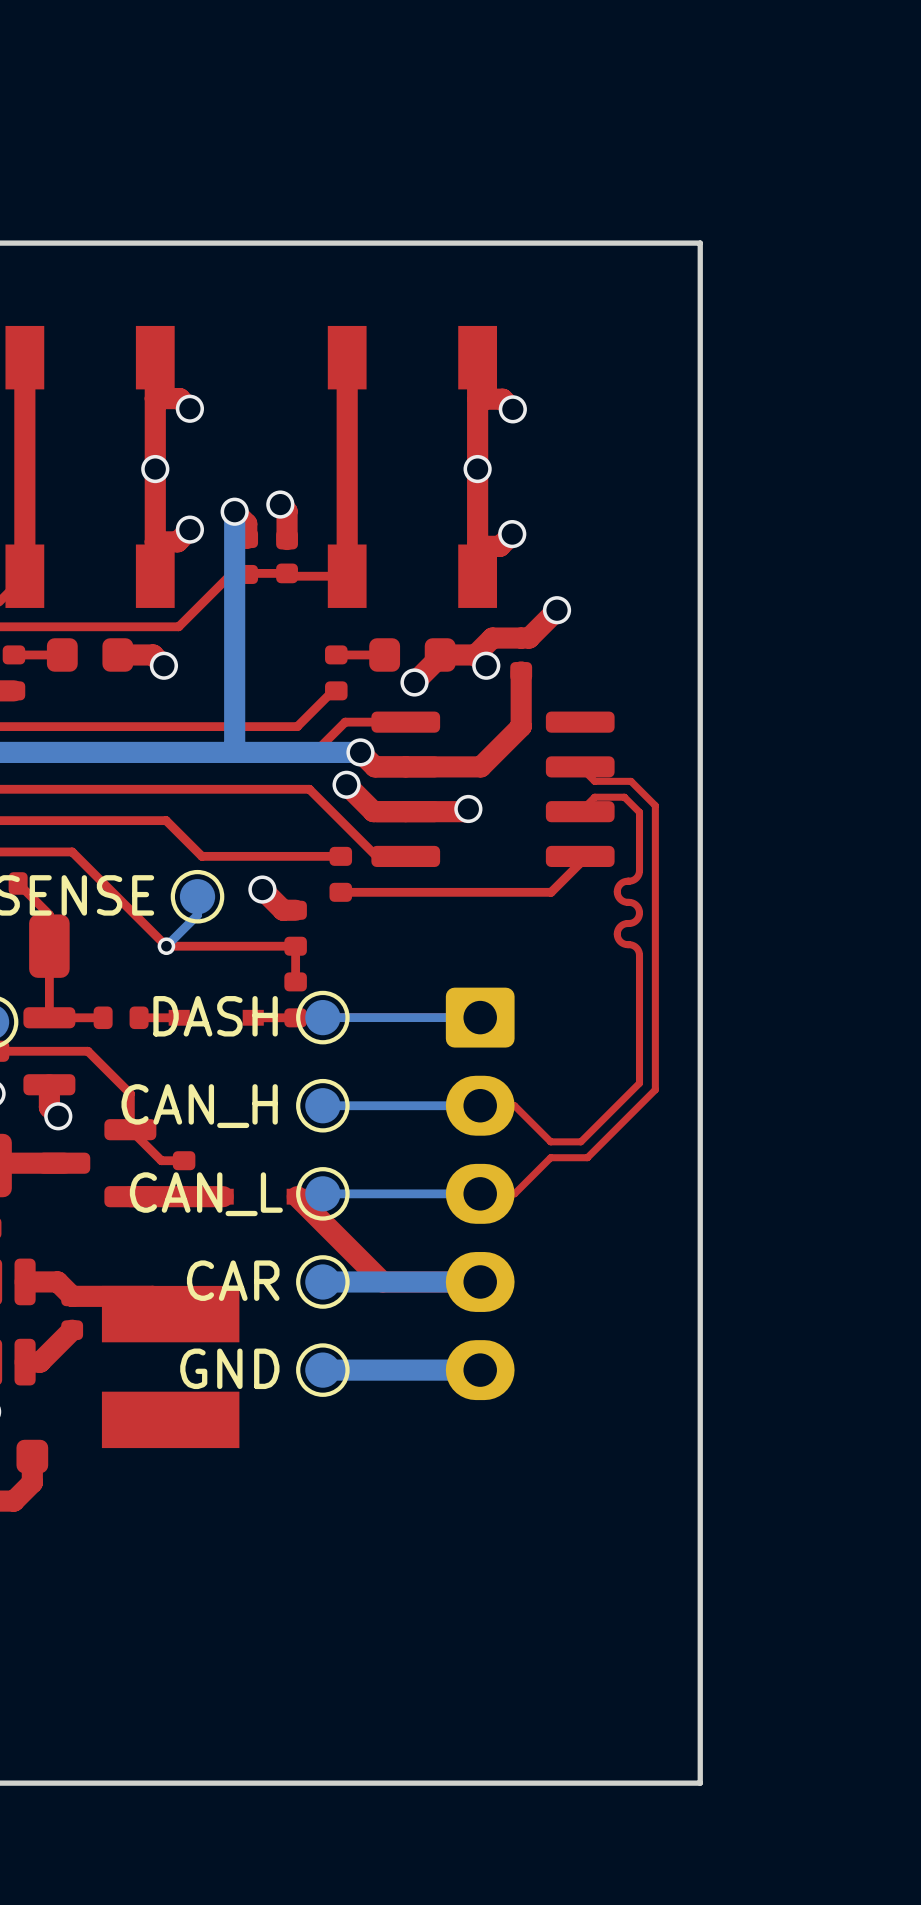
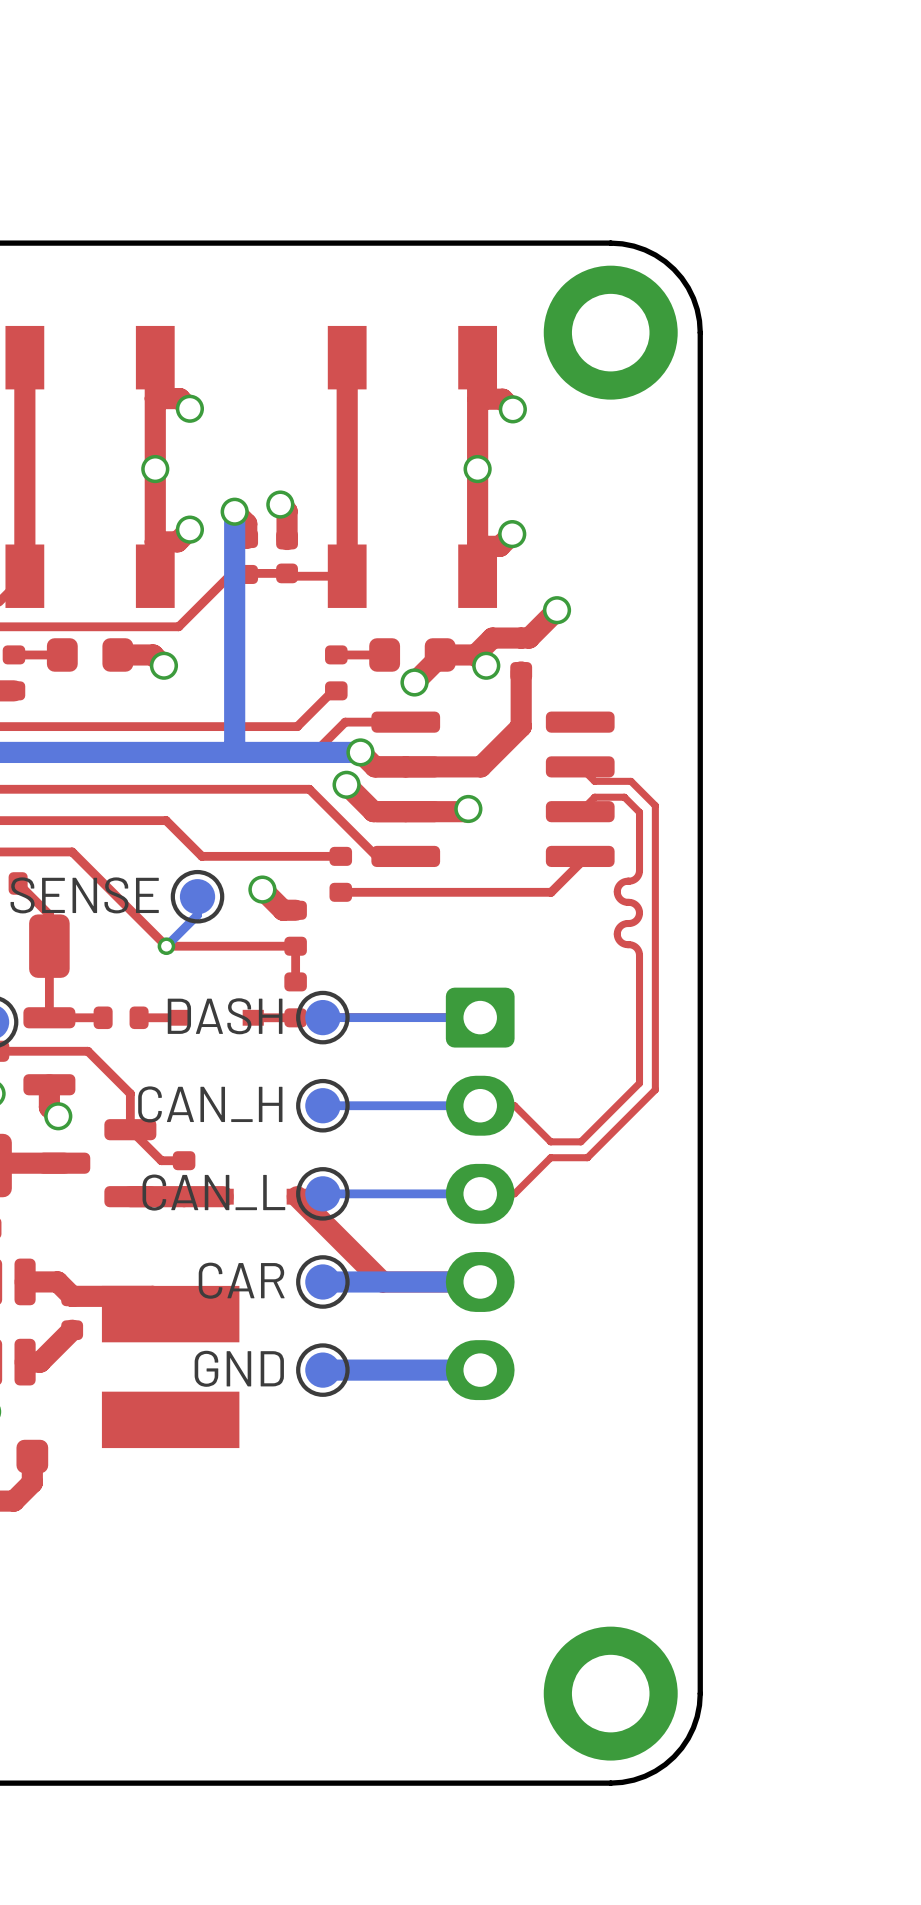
board edge: (610, 243) (700, 243) (700, 332) -> (610, 243) (622, 243) (644, 249) (655, 255) (674, 269) (681, 278) (693, 298) (699, 320) (700, 332)
part: none -> (610, 332)
part: none -> (610, 1693)
board edge: (700, 1693) (700, 1783) (610, 1783) -> (700, 1693) (699, 1705) (693, 1727) (688, 1738) (674, 1756) (655, 1771) (644, 1776) (622, 1782) (610, 1783)

